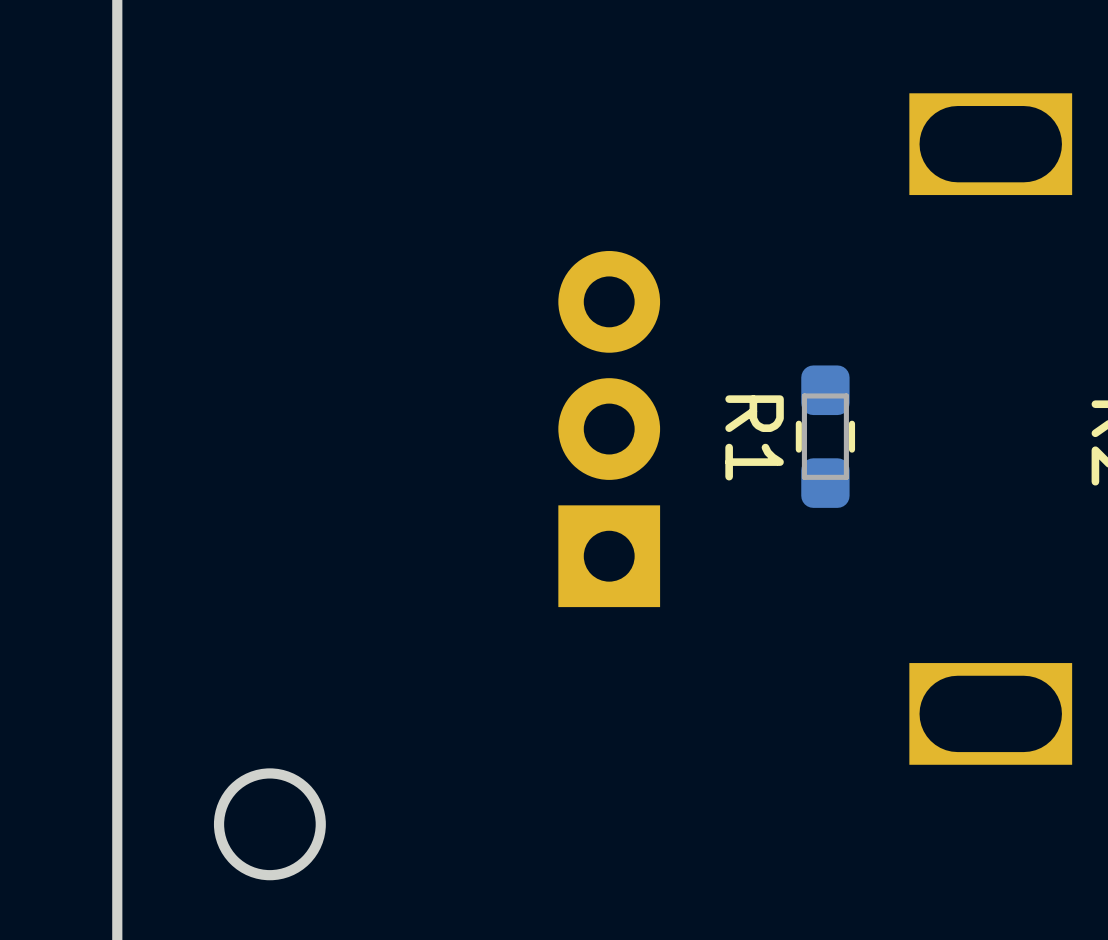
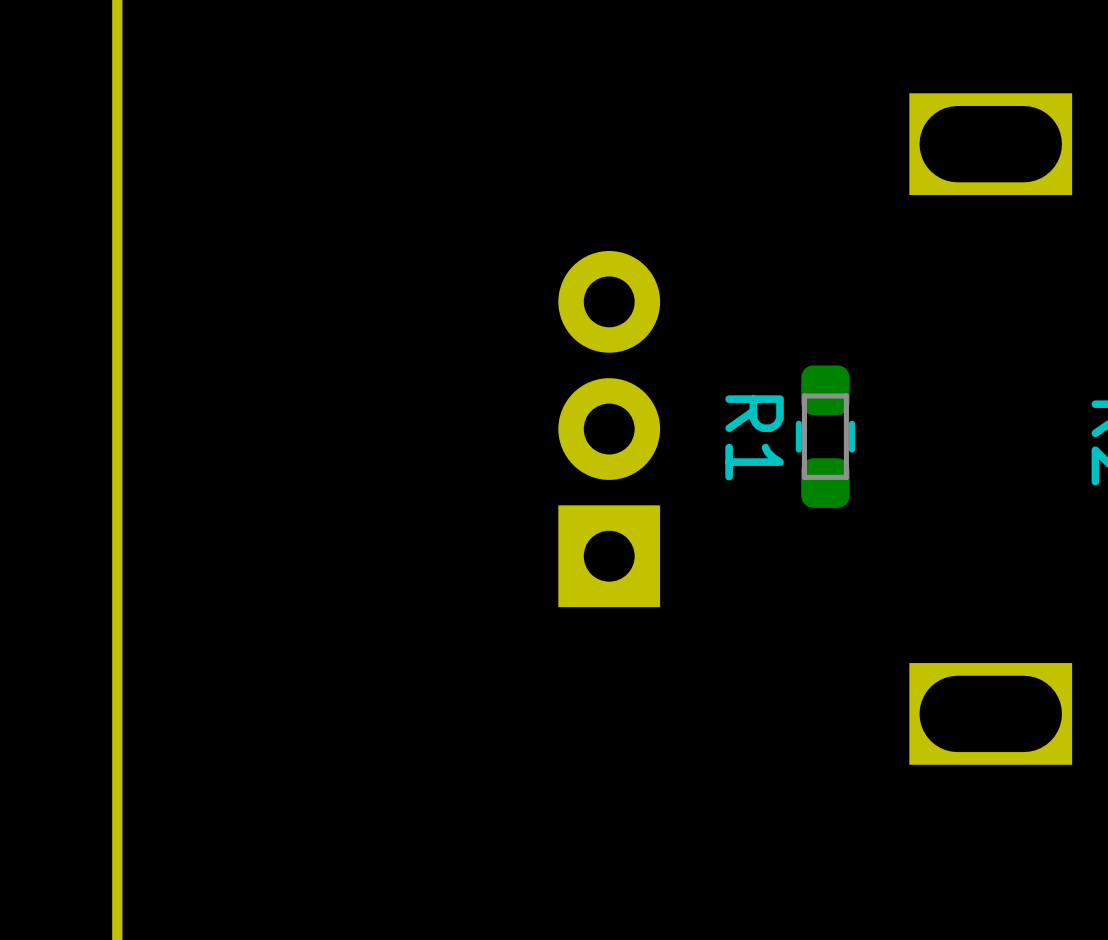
round board edge: [213, 768, 326, 881] -> none

